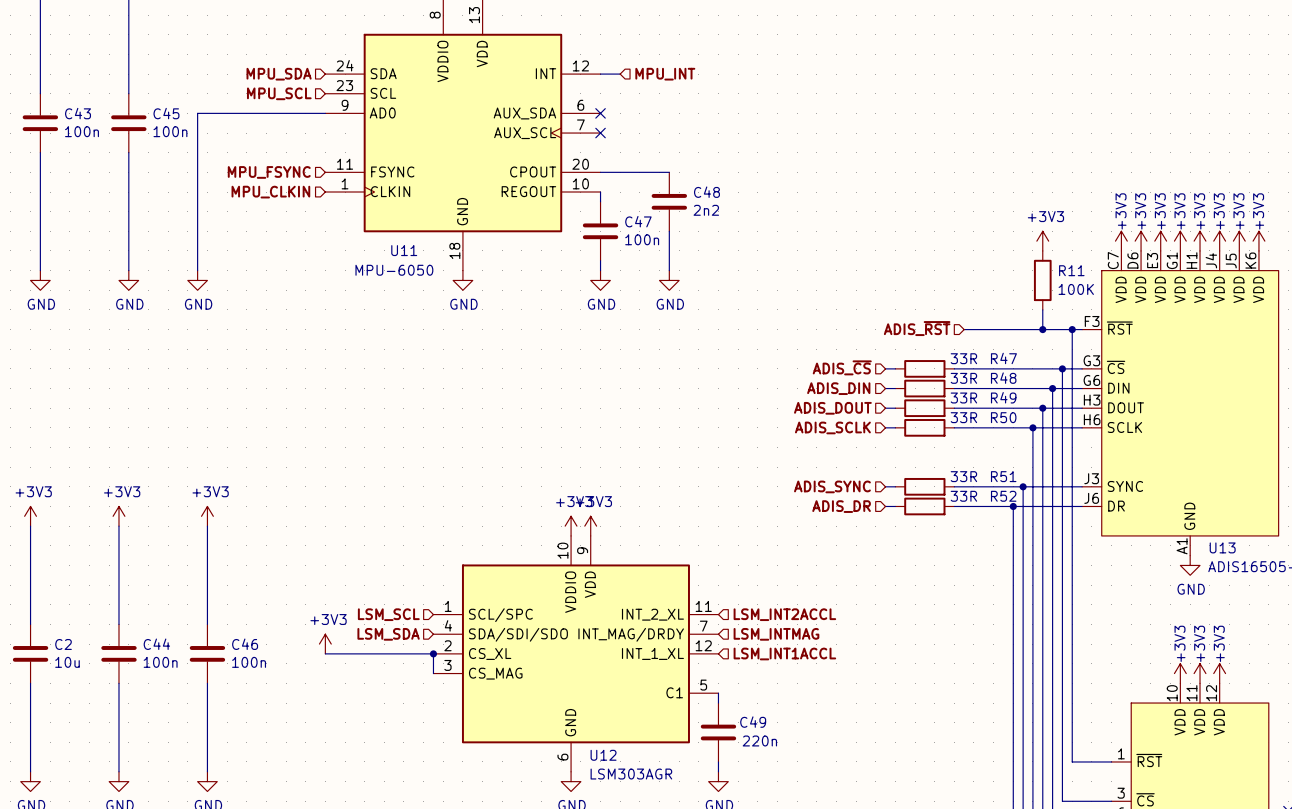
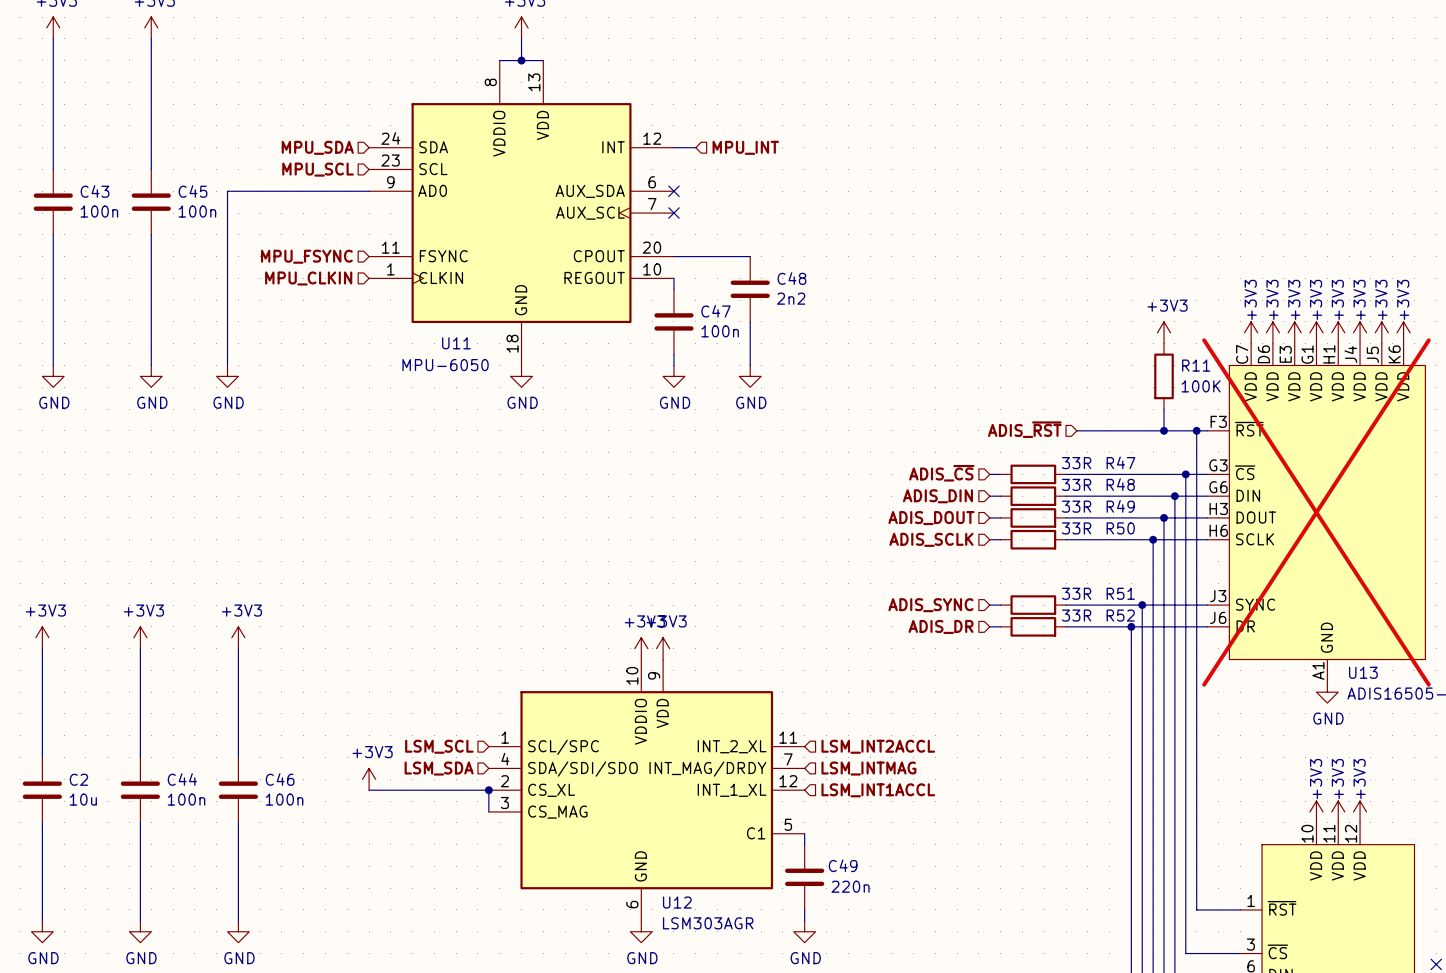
U13 do-not-place cross: none -> (1316, 512)

